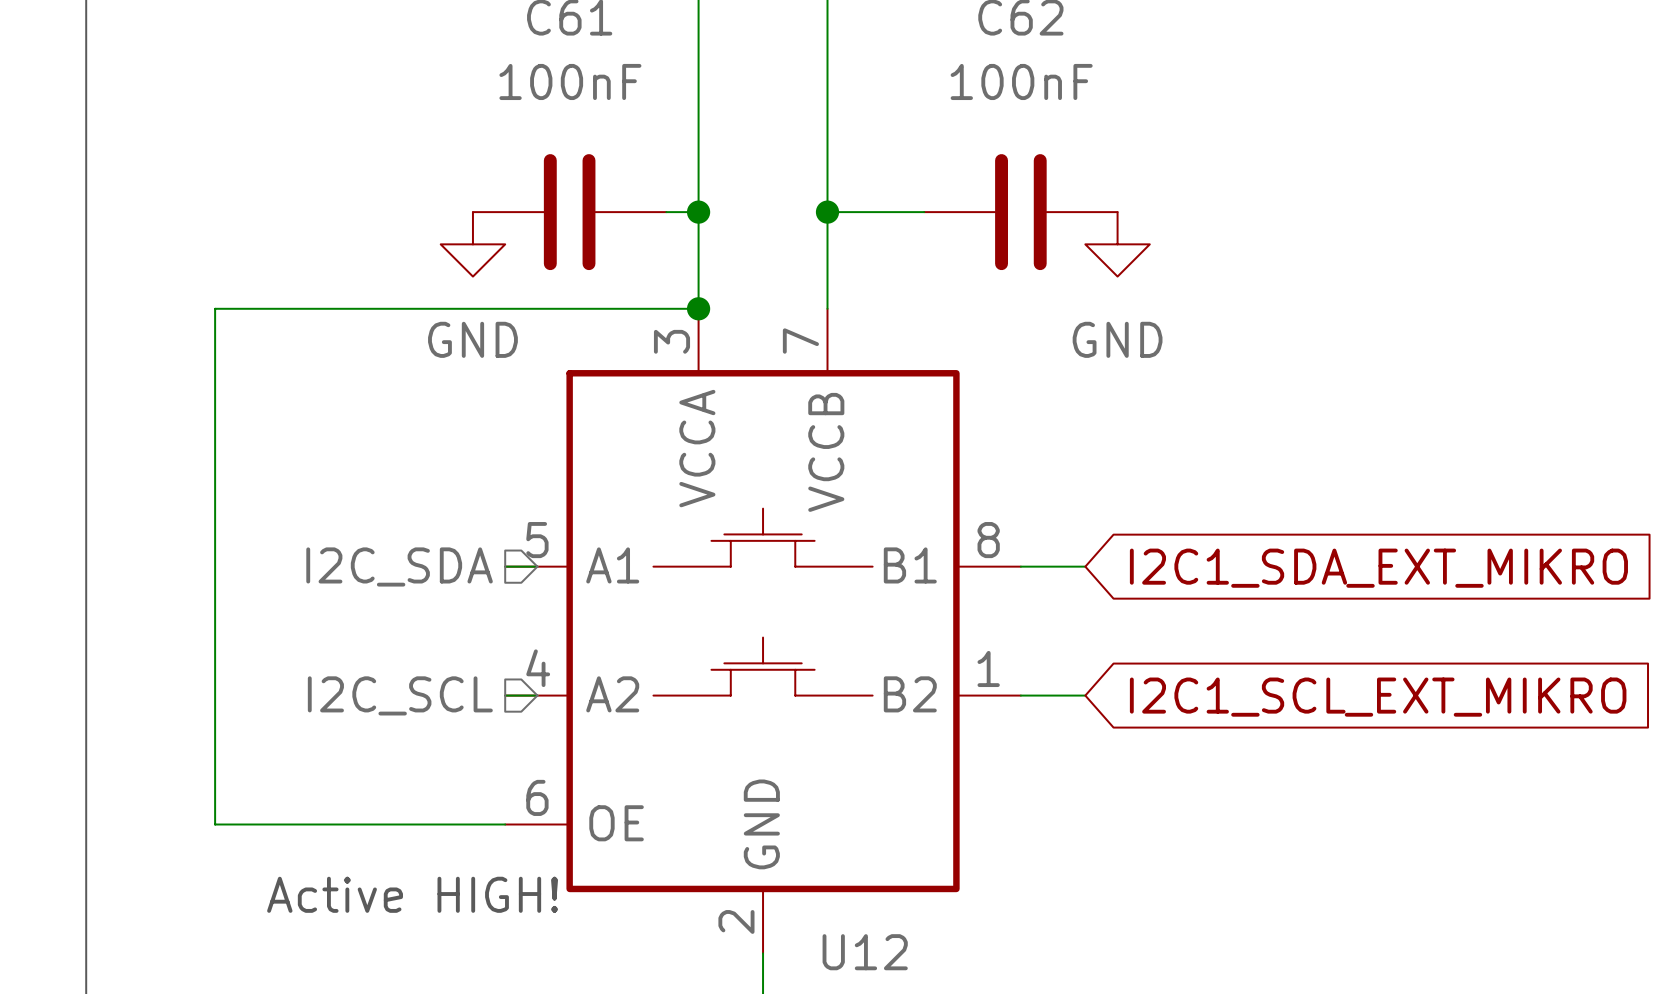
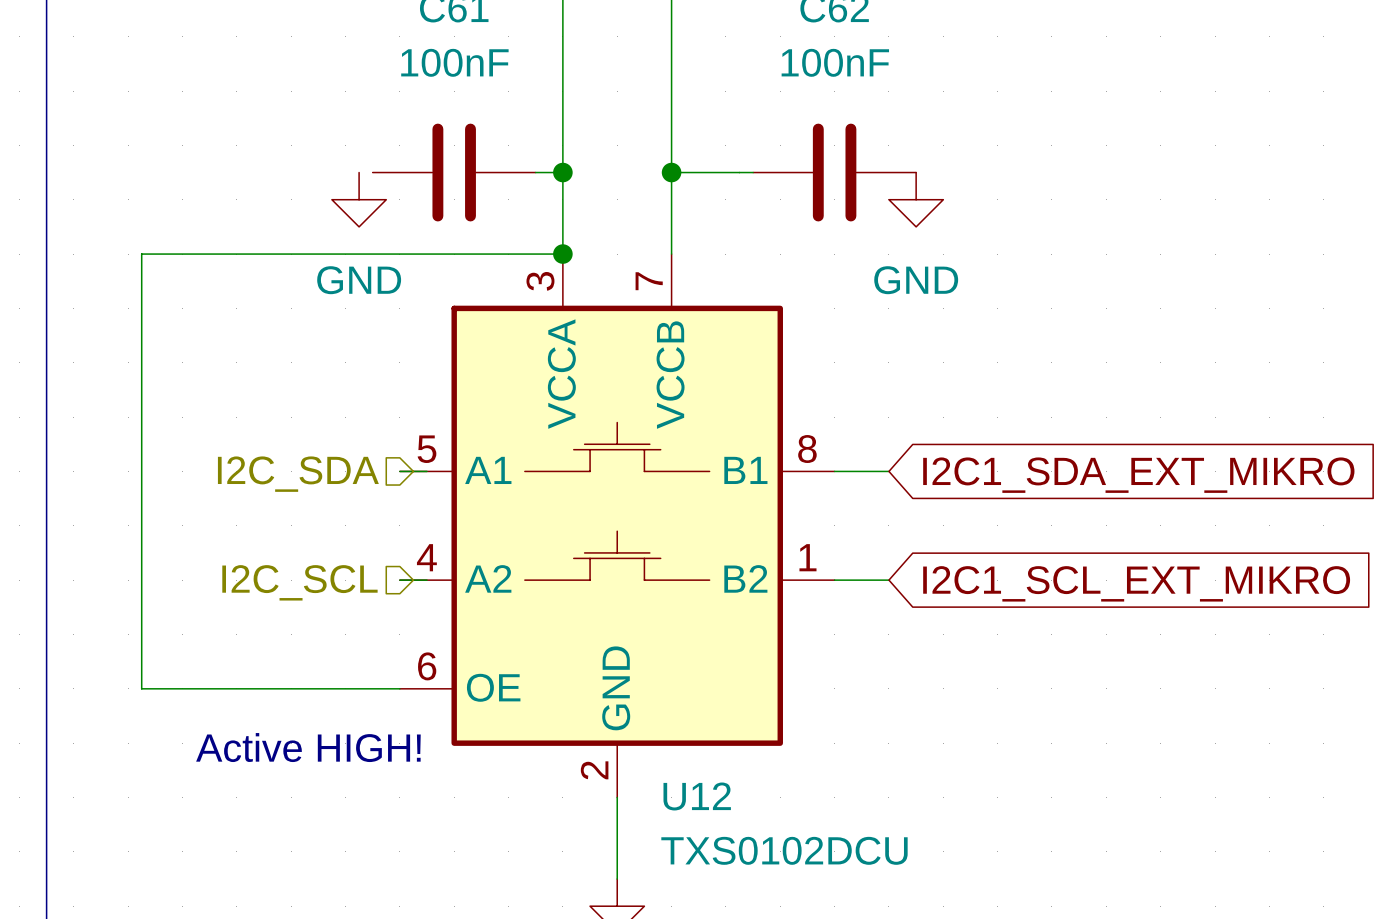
power symbol position: GND (472, 244) -> GND (359, 199)
wire: (215, 308) (215, 824) -> (155, 254) (141, 254) (141, 688) (155, 688)
hierarchical label position: I2C_SDA (399, 566) -> I2C_SDA (298, 474)
hierarchical label position: I2C_SCL (400, 695) -> I2C_SCL (299, 582)

